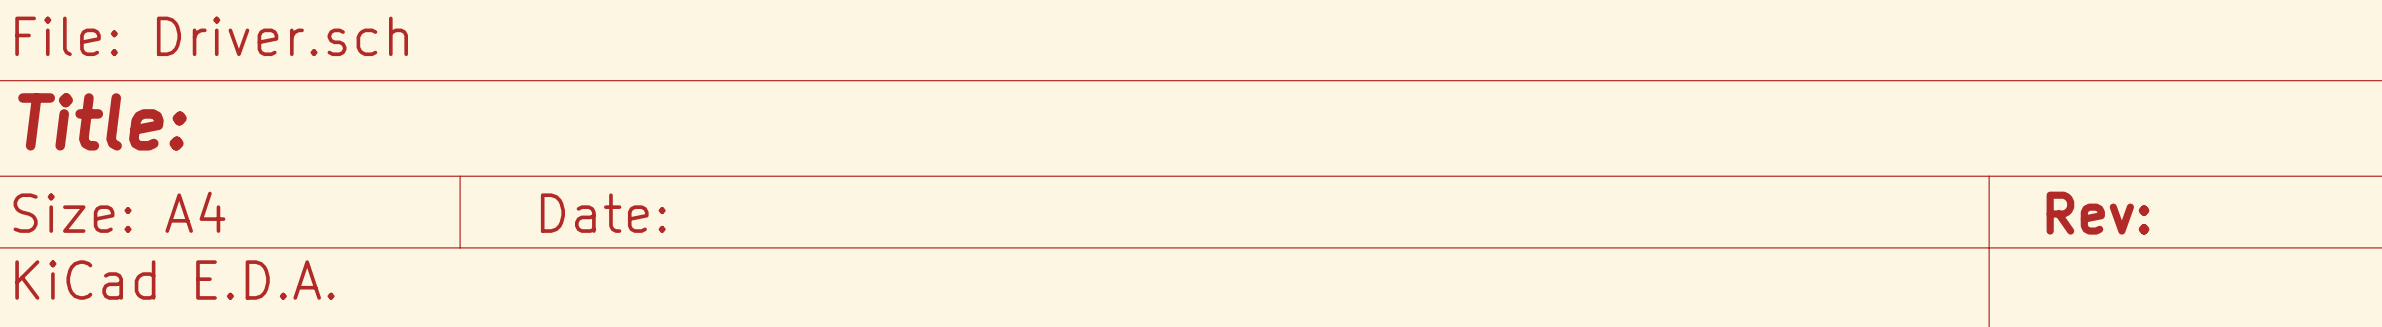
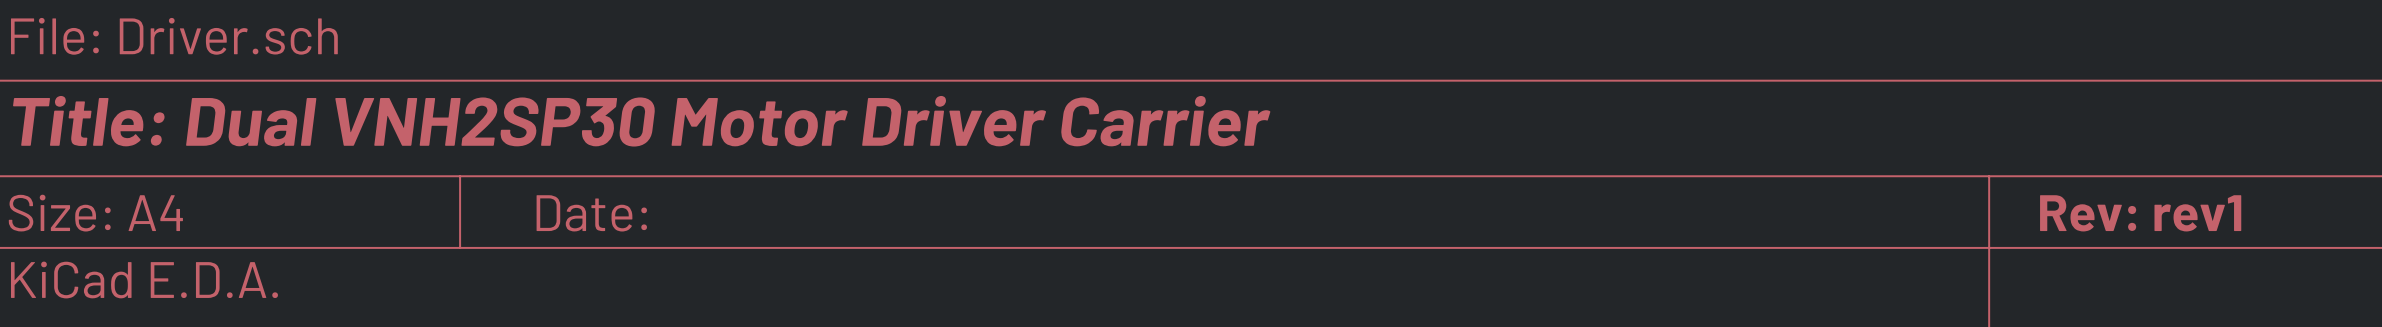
title block: Title: (102, 121) -> Title: Dual VNH2SP30 Motor Driver Carrier (641, 121)
title block: Rev: (2097, 213) -> Rev: rev1 (2140, 213)

